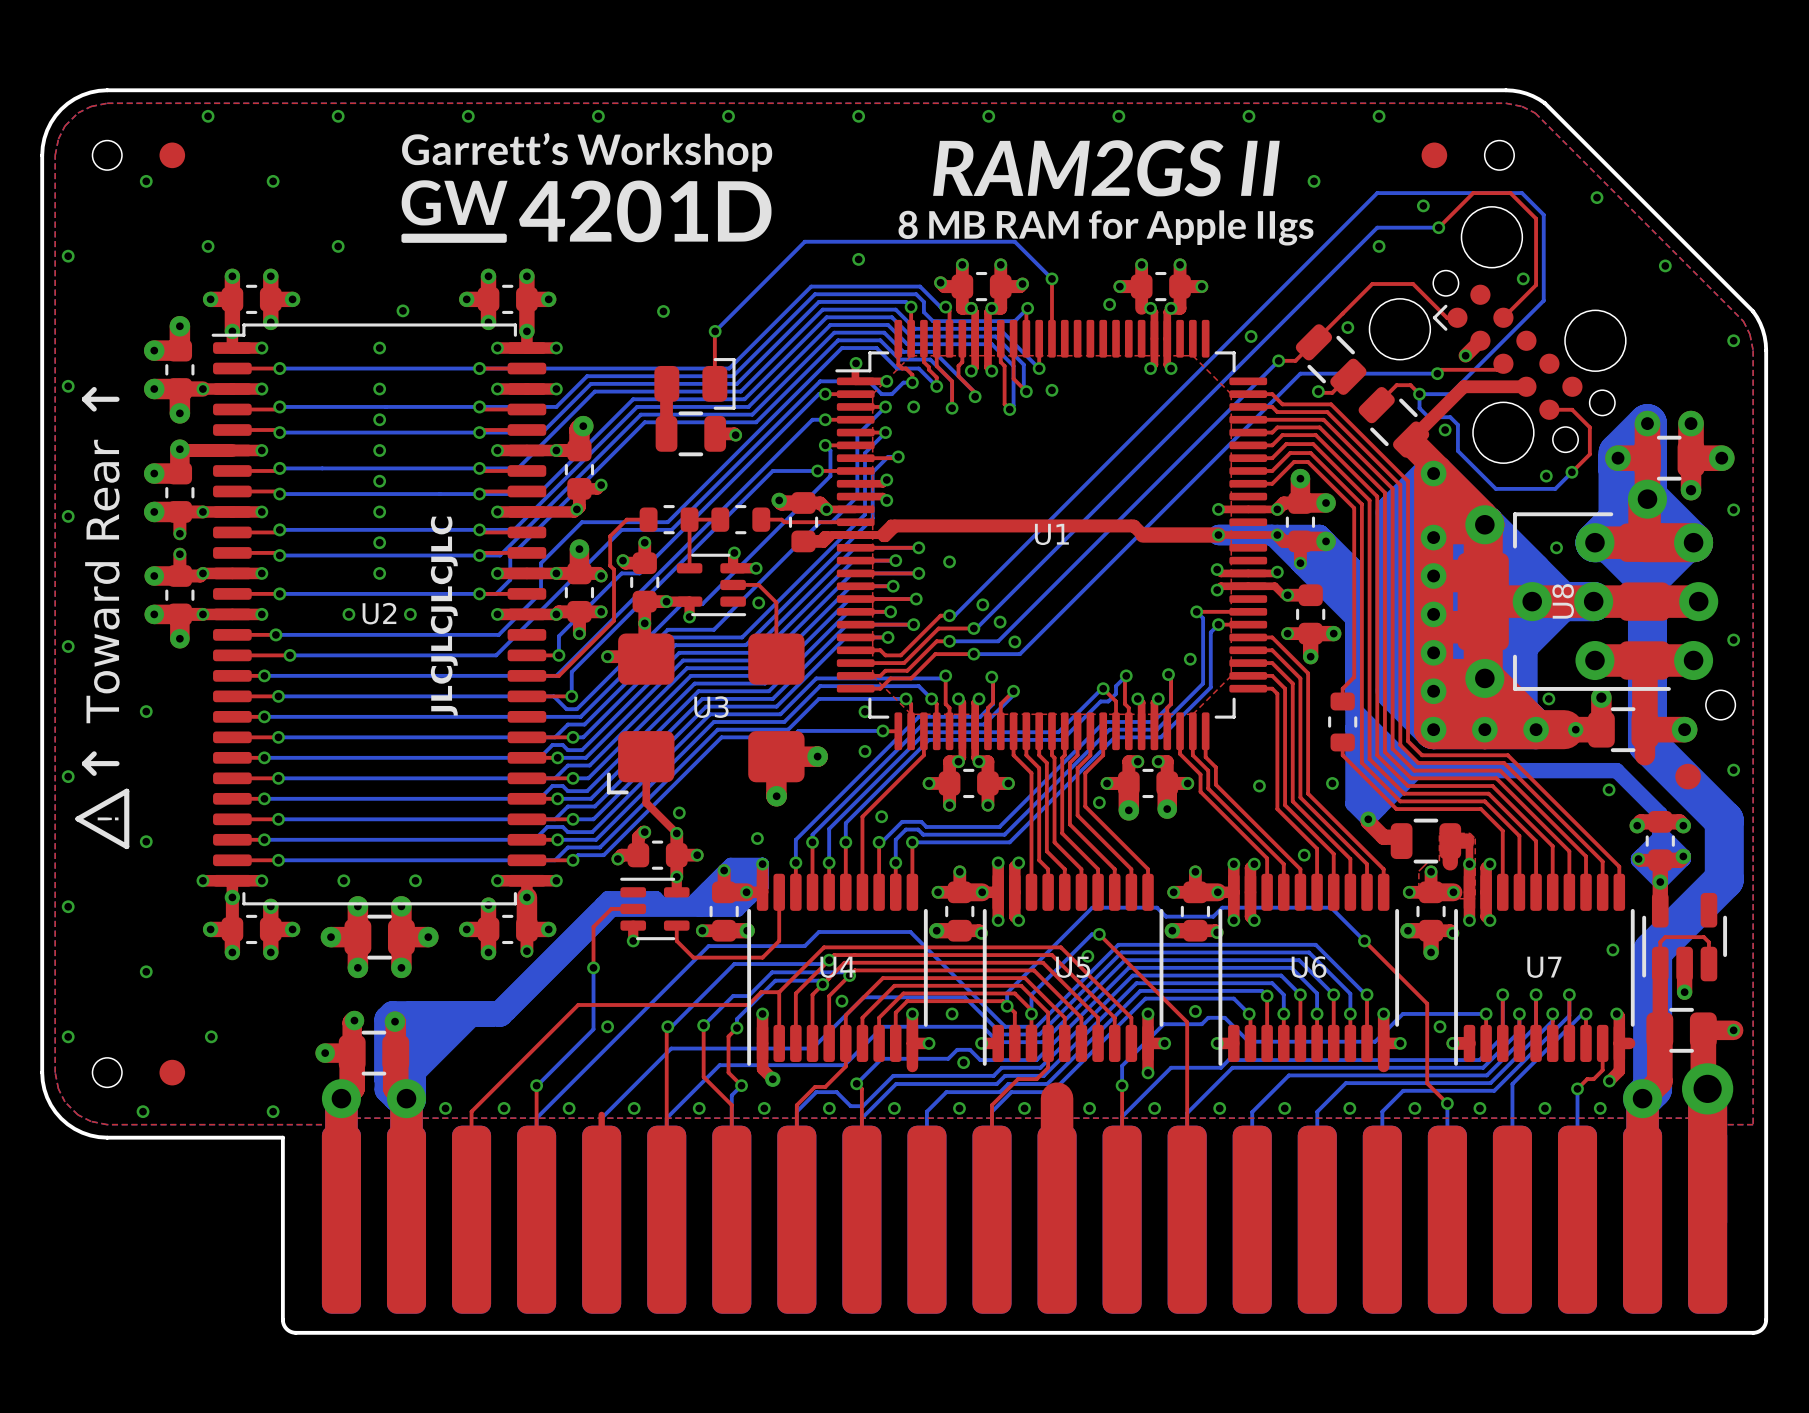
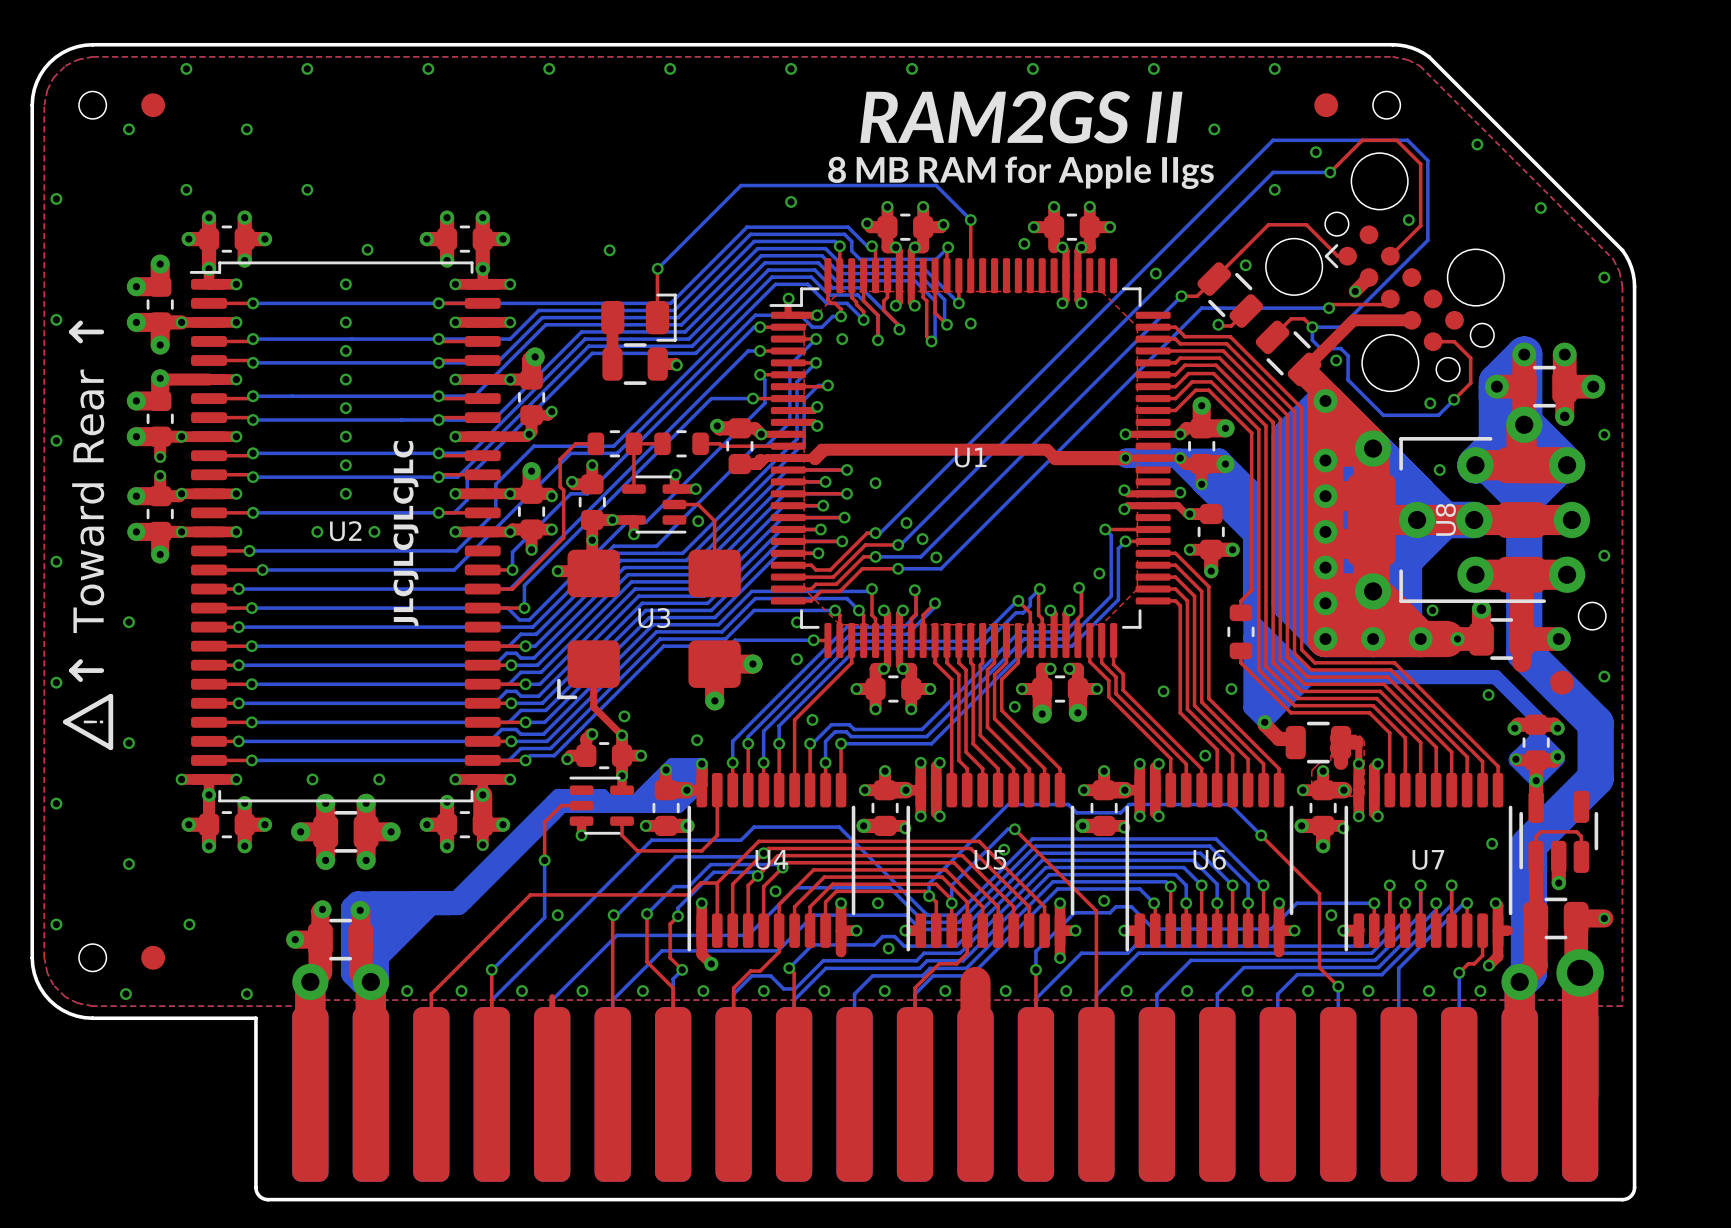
drawing: [401, 132, 773, 243] -> none

